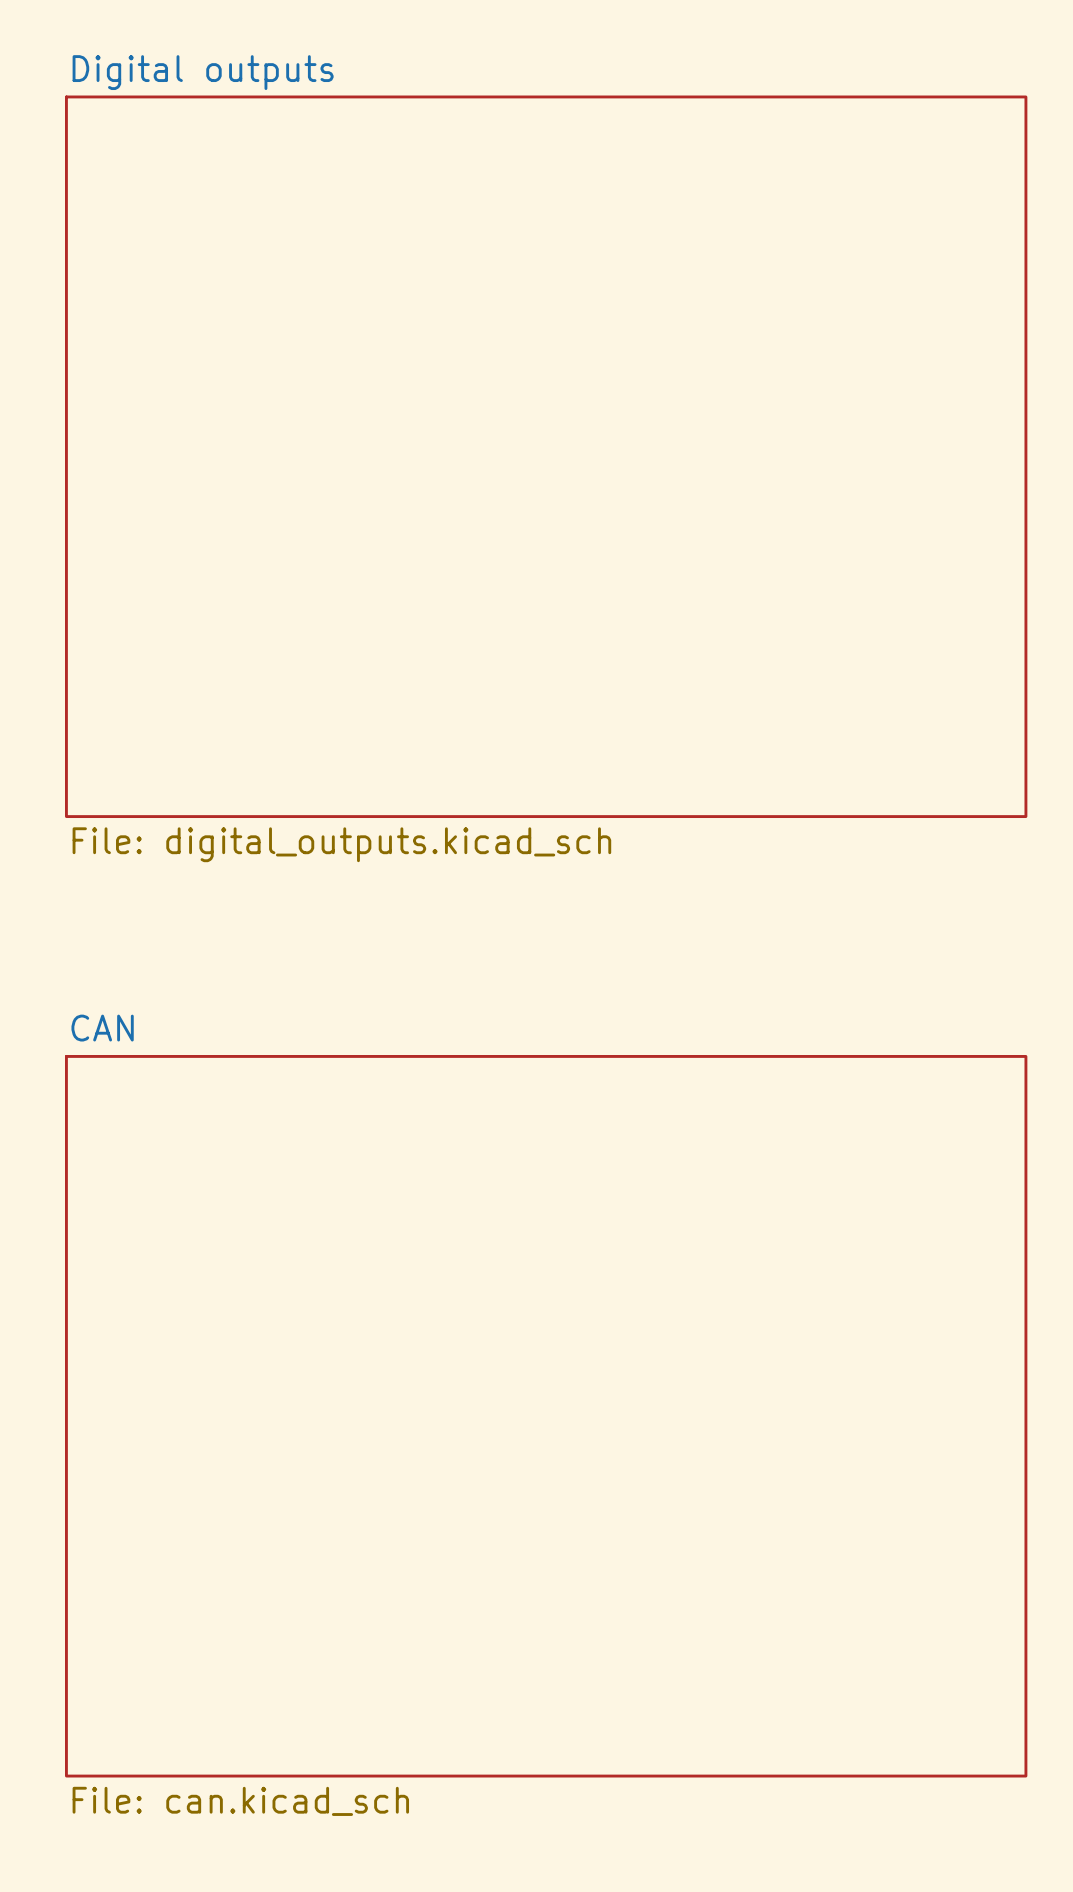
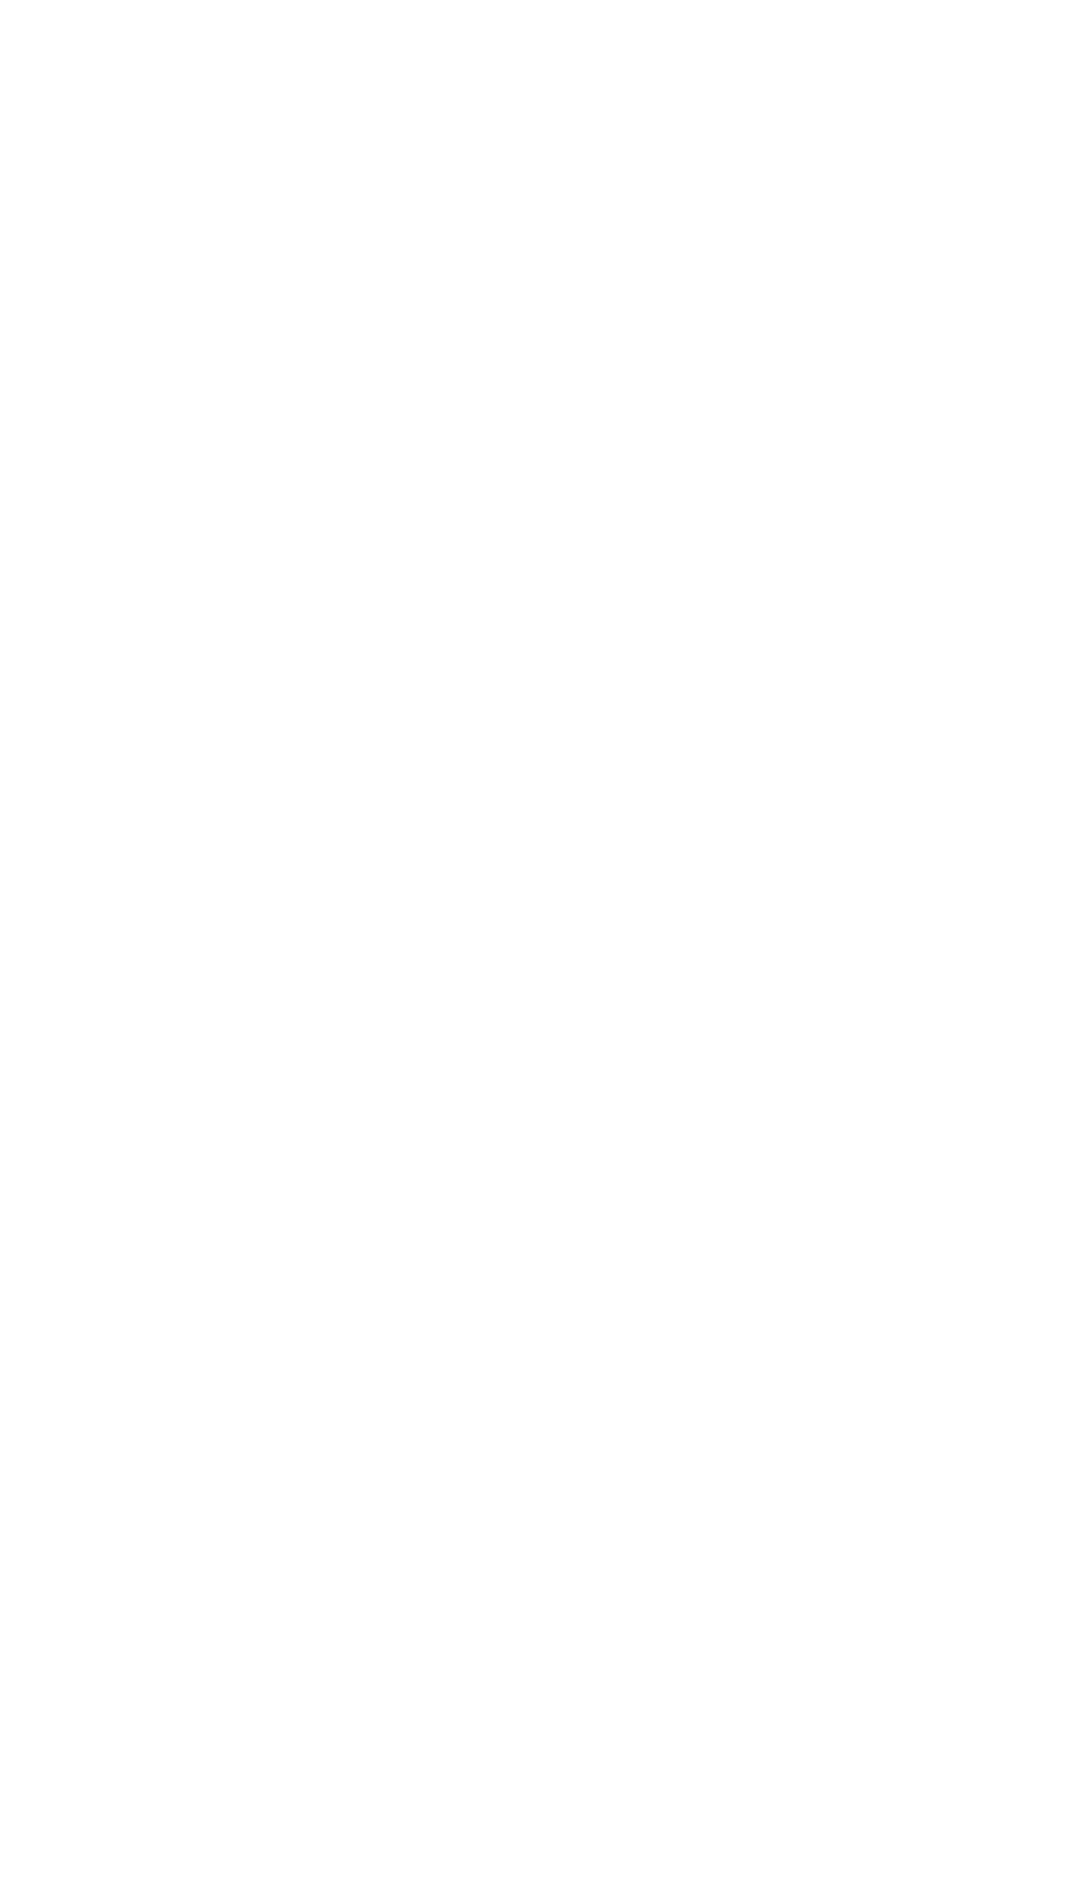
sheet Digital outputs: File: digital_outputs.kicad_sch (546, 456) -> none
sheet CAN: File: can.kicad_sch (546, 1416) -> none

